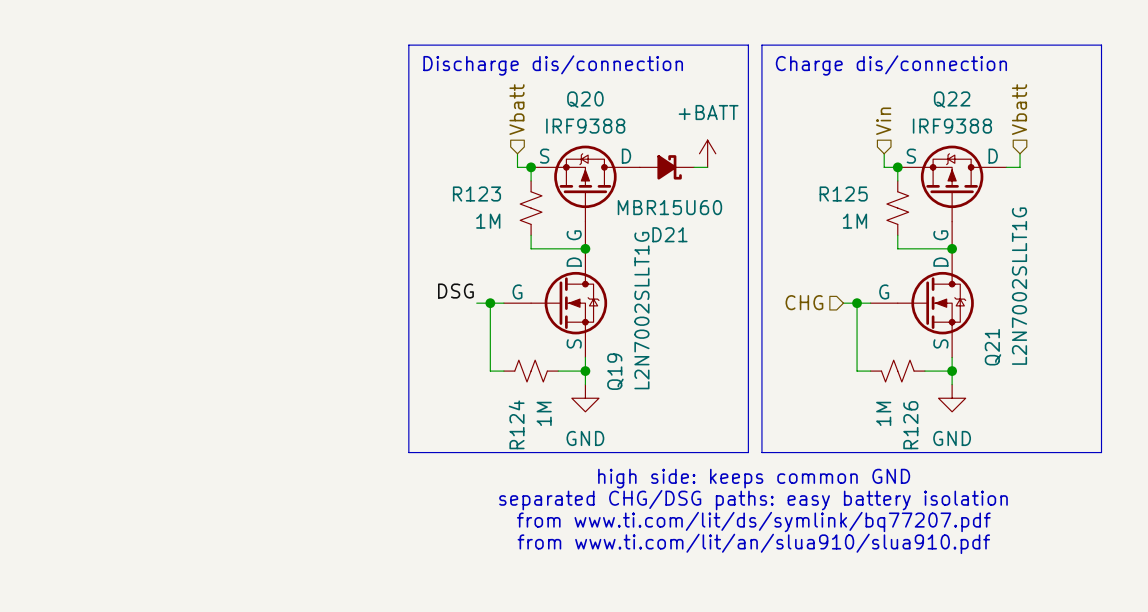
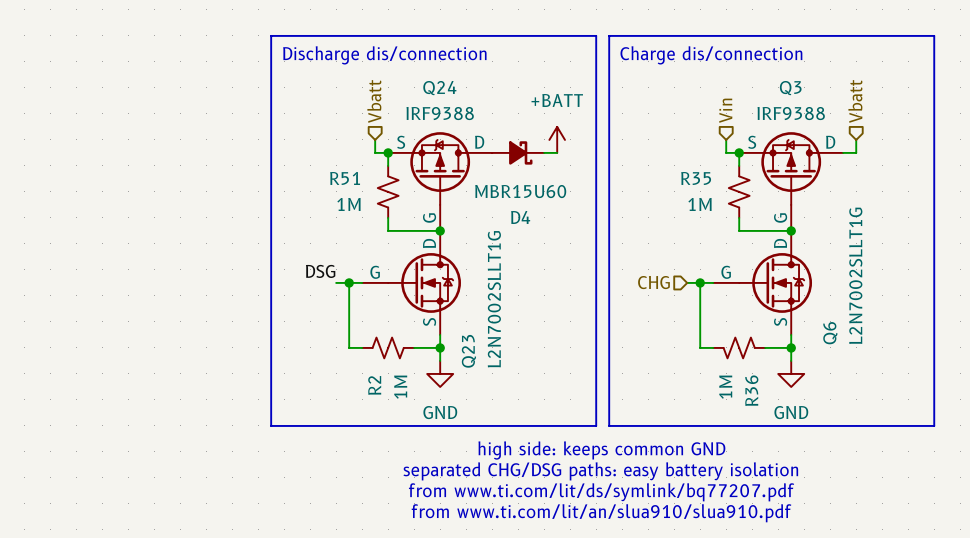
Q20 name: Q20 (585, 99) -> Q24 (439, 88)
Q22 name: Q22 (952, 99) -> Q3 (790, 88)
R123 name: R123 (476, 194) -> R51 (345, 178)
R125 name: R125 (843, 194) -> R35 (696, 178)
D21 name: D21 (669, 234) -> D4 (520, 217)
Q21 name: Q21 (992, 347) -> Q6 (830, 333)
Q19 name: Q19 (615, 371) -> Q23 (468, 351)
R124 name: R124 (516, 424) -> R2 (374, 385)
R126 name: R126 (910, 425) -> R36 (751, 390)

